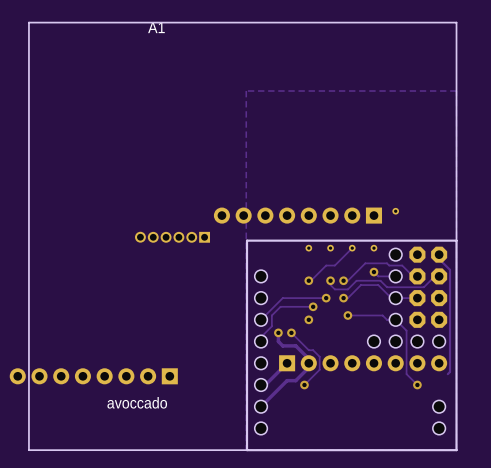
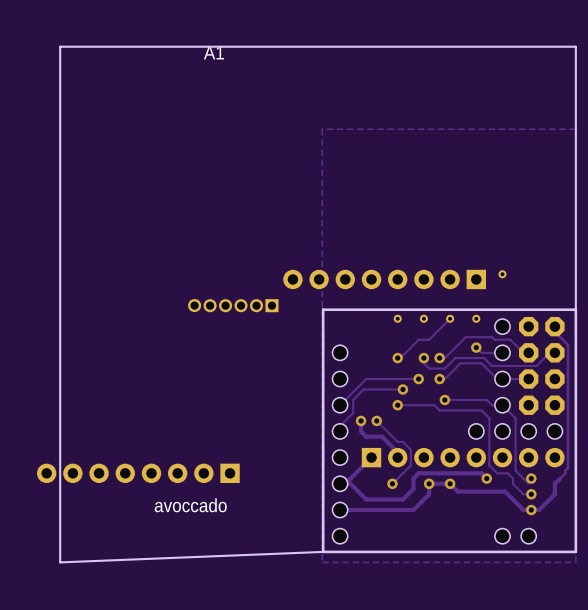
track: none -> (397, 405) (434, 405) (439, 410) (481, 410) (489, 418) (489, 465) (497, 473) (507, 473) (512, 478) (512, 483) (523, 494) (531, 494)
track: (308, 363) (308, 367) (295, 380) (287, 380) (261, 406) -> (565, 470) (565, 473) (554, 483) (554, 494) (539, 510) (523, 510) (505, 491) (457, 491) (450, 483) (429, 483) (429, 494) (413, 510) (340, 510)
track: none -> (486, 478) (481, 473) (418, 473) (413, 478) (413, 489) (402, 499) (366, 499) (350, 483) (345, 483)
via: none -> (486, 478)
via: none -> (531, 478)
via: none -> (429, 483)
via: none -> (450, 483)
via: (417, 384) -> none
via: none -> (531, 494)
via: none -> (531, 510)
part: (439, 406) -> none
part: none -> (502, 536)
part: none -> (528, 536)
part: (439, 428) -> none
board edge: (247, 441) (247, 450) -> none
board edge: (456, 441) (456, 450) (247, 450) -> none
board edge: (247, 450) (28, 450) -> (575, 551) (323, 551) (60, 562)

